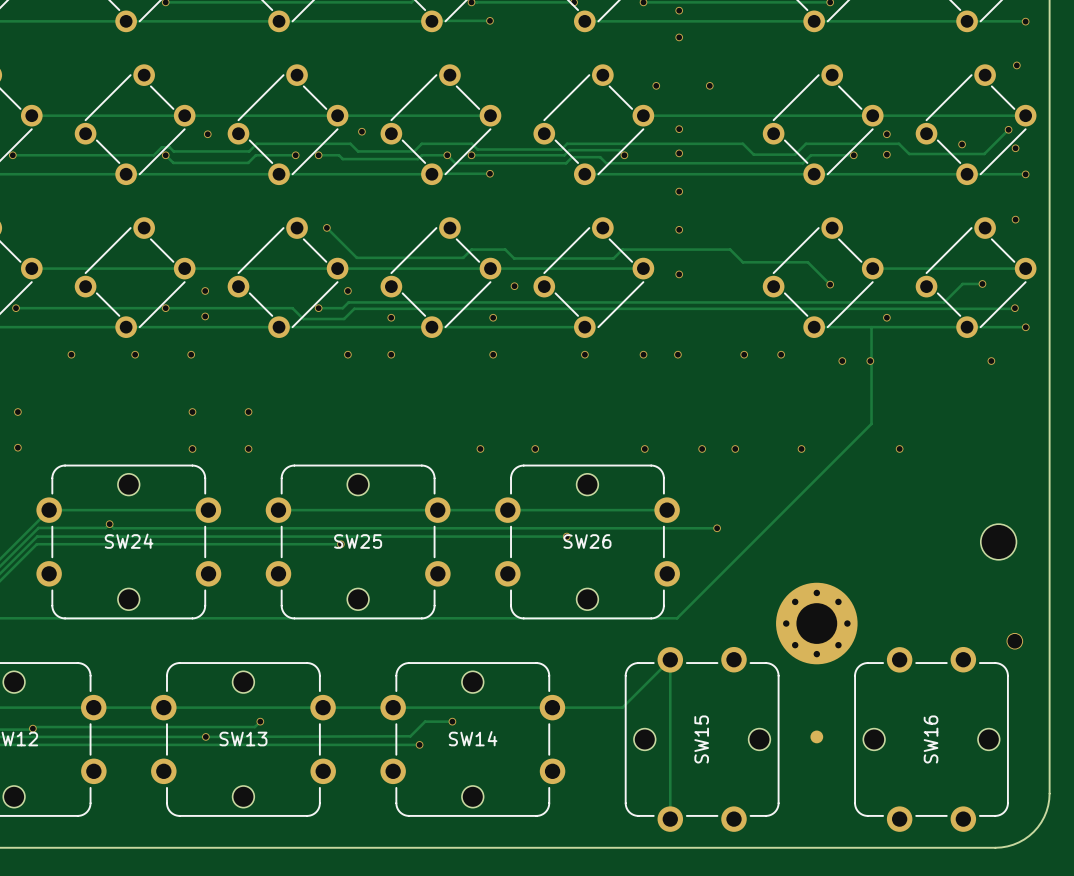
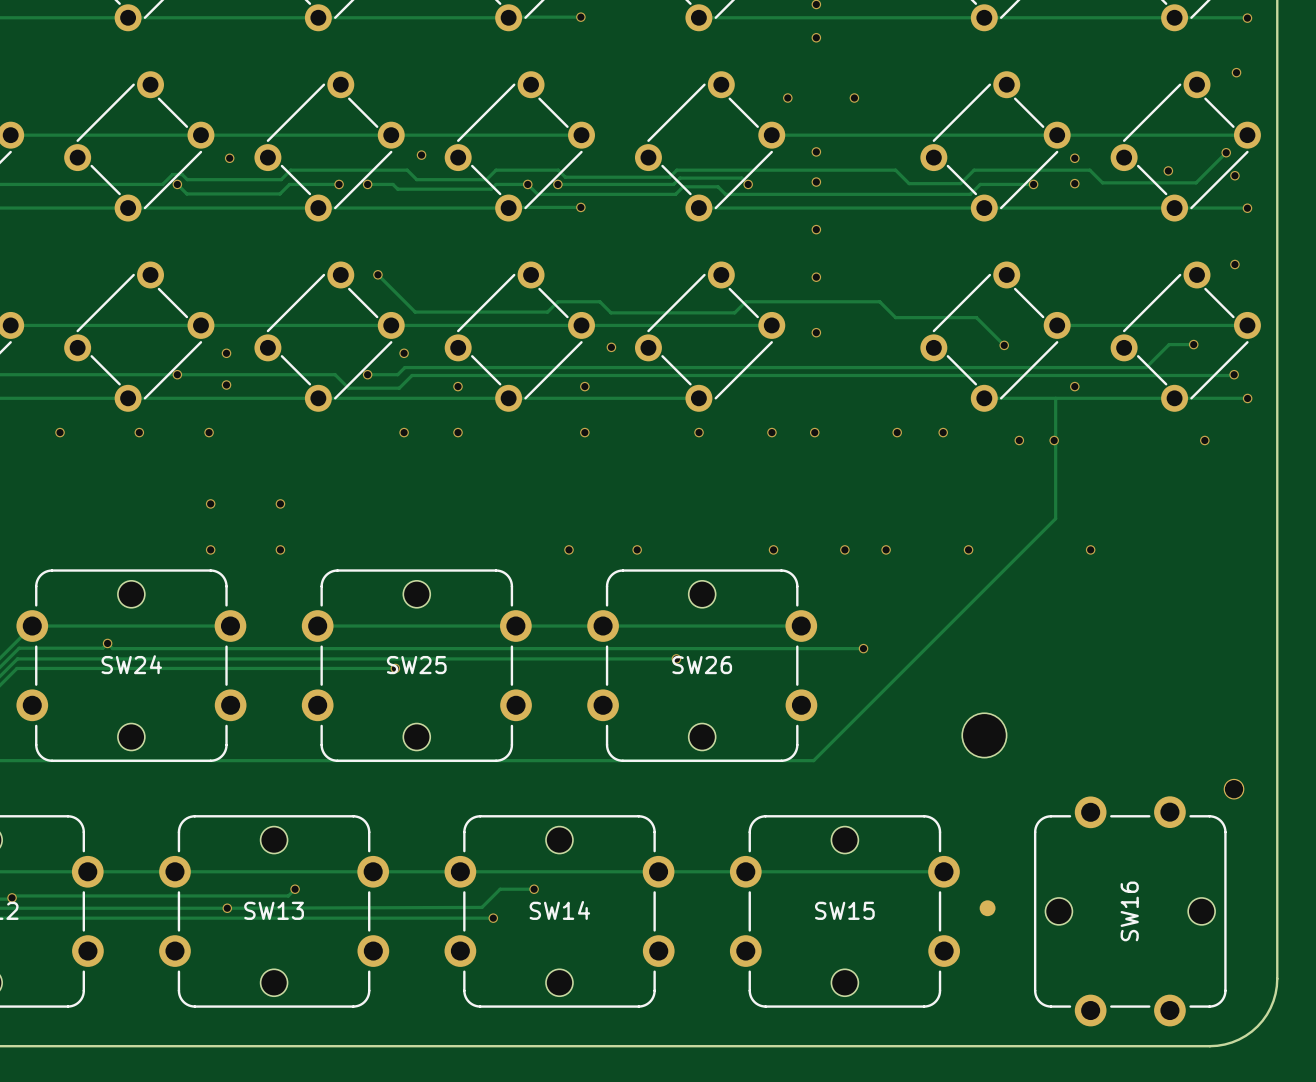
part position: (998, 541) -> (984, 735)
part: (816, 623) -> none
track: (622, 707) (670, 659) (670, 819) -> (745, 871) (943, 871)
SW15 rotation: 0° (702, 739) -> 90° clockwise (844, 911)

